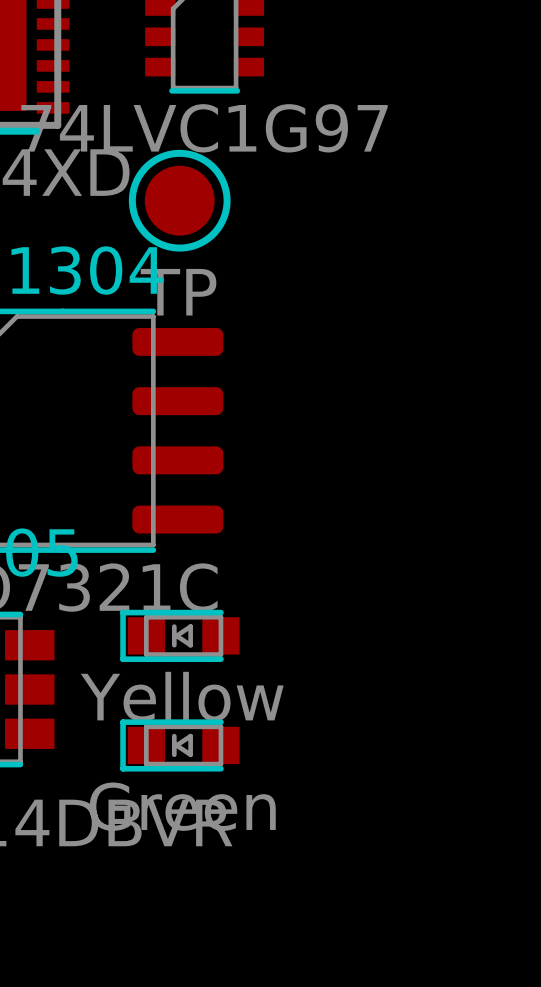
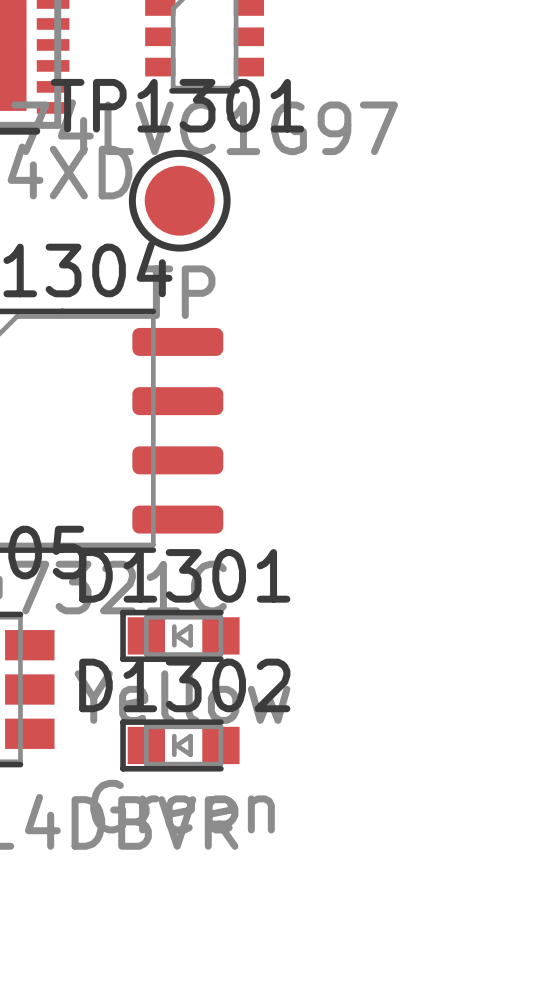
TP1301 name: none -> TP1301 (177, 105)
D1301 name: none -> D1301 (184, 575)
D1302 name: none -> D1302 (184, 685)

